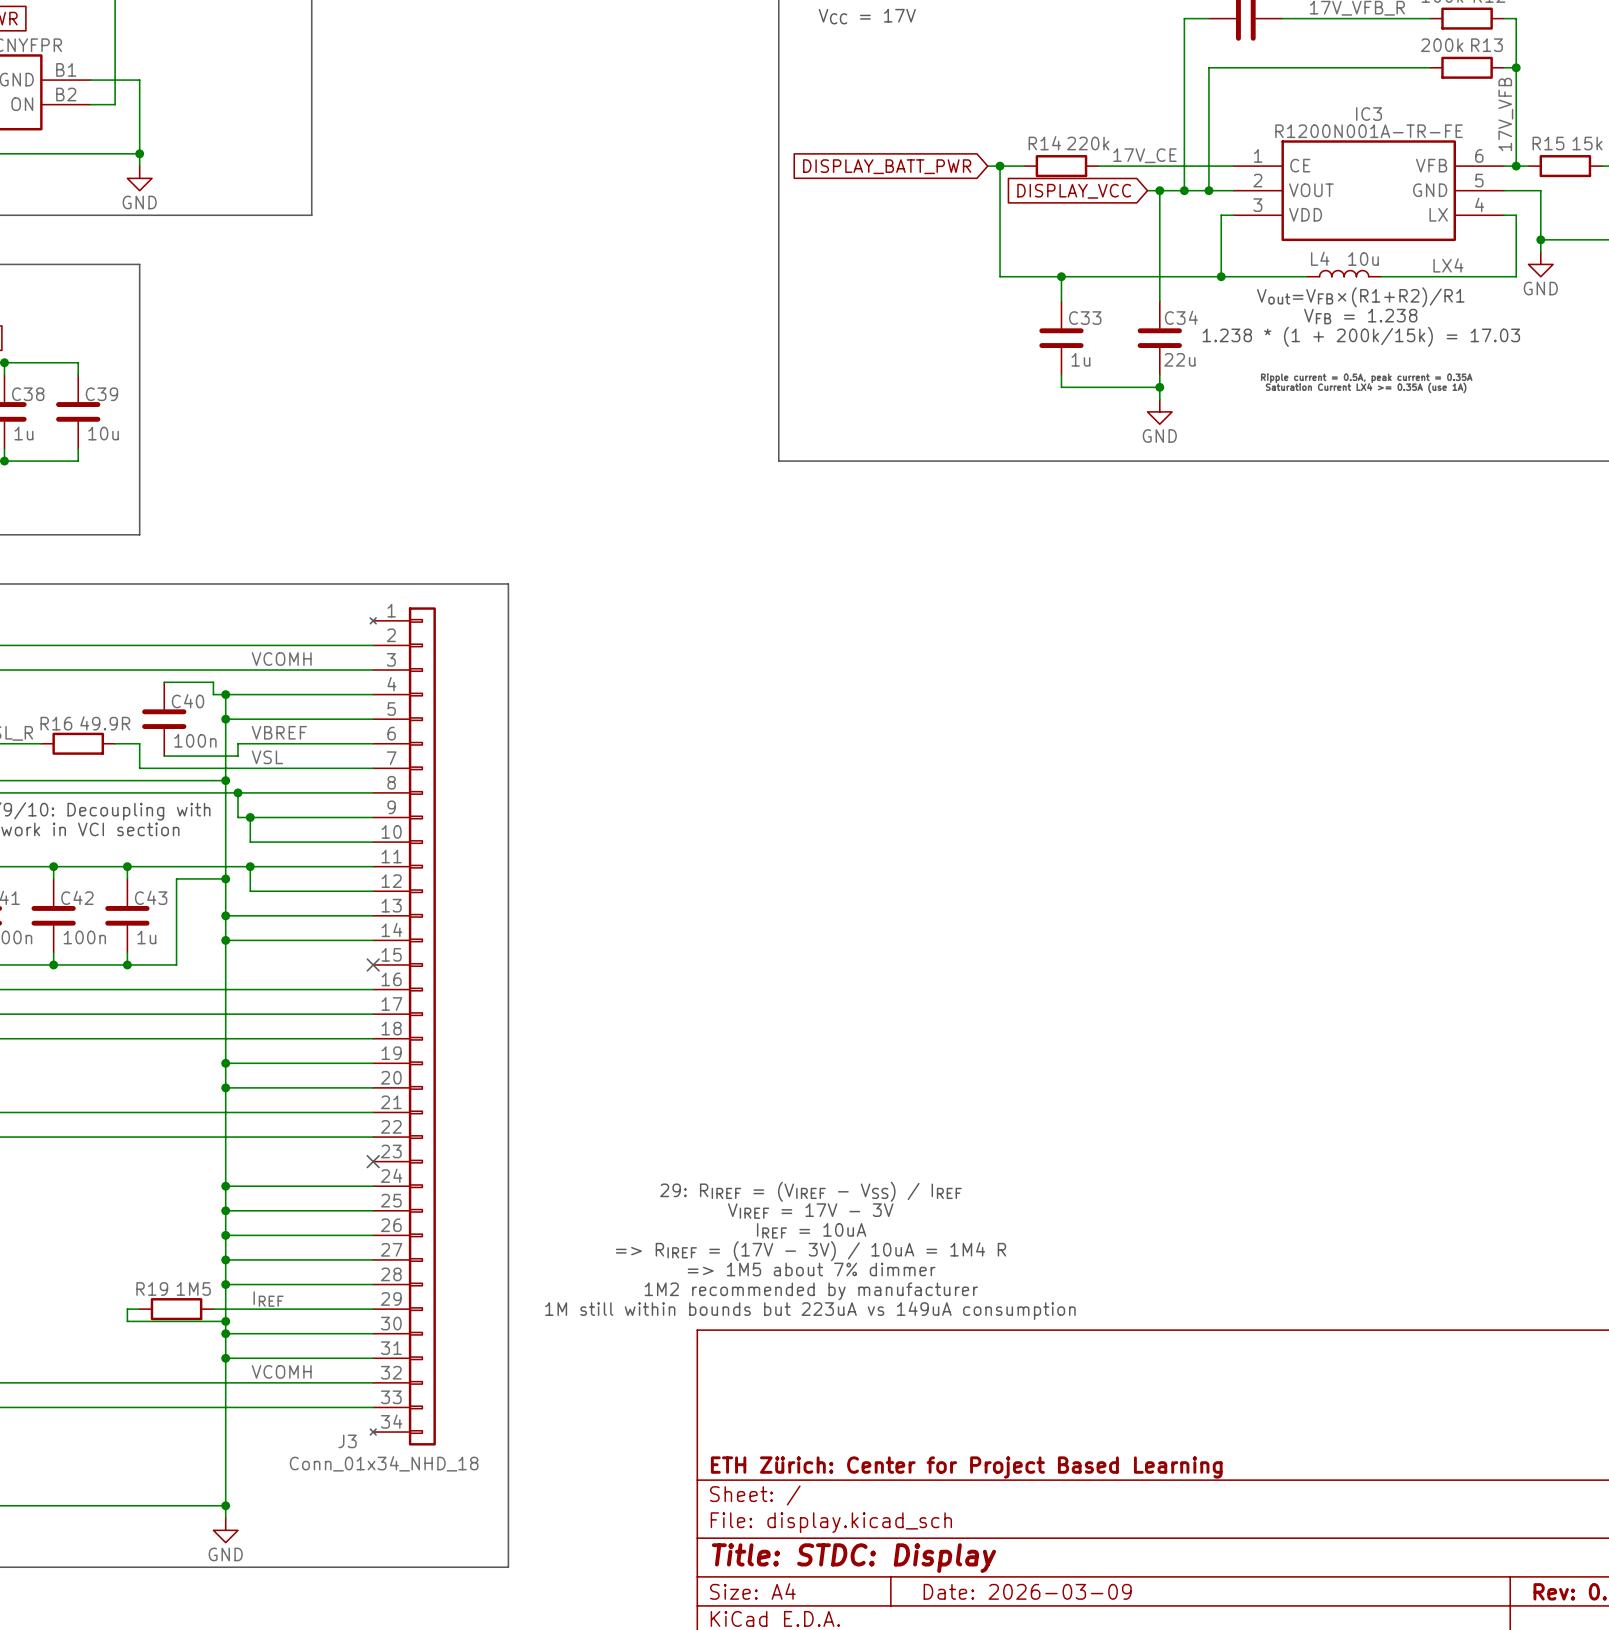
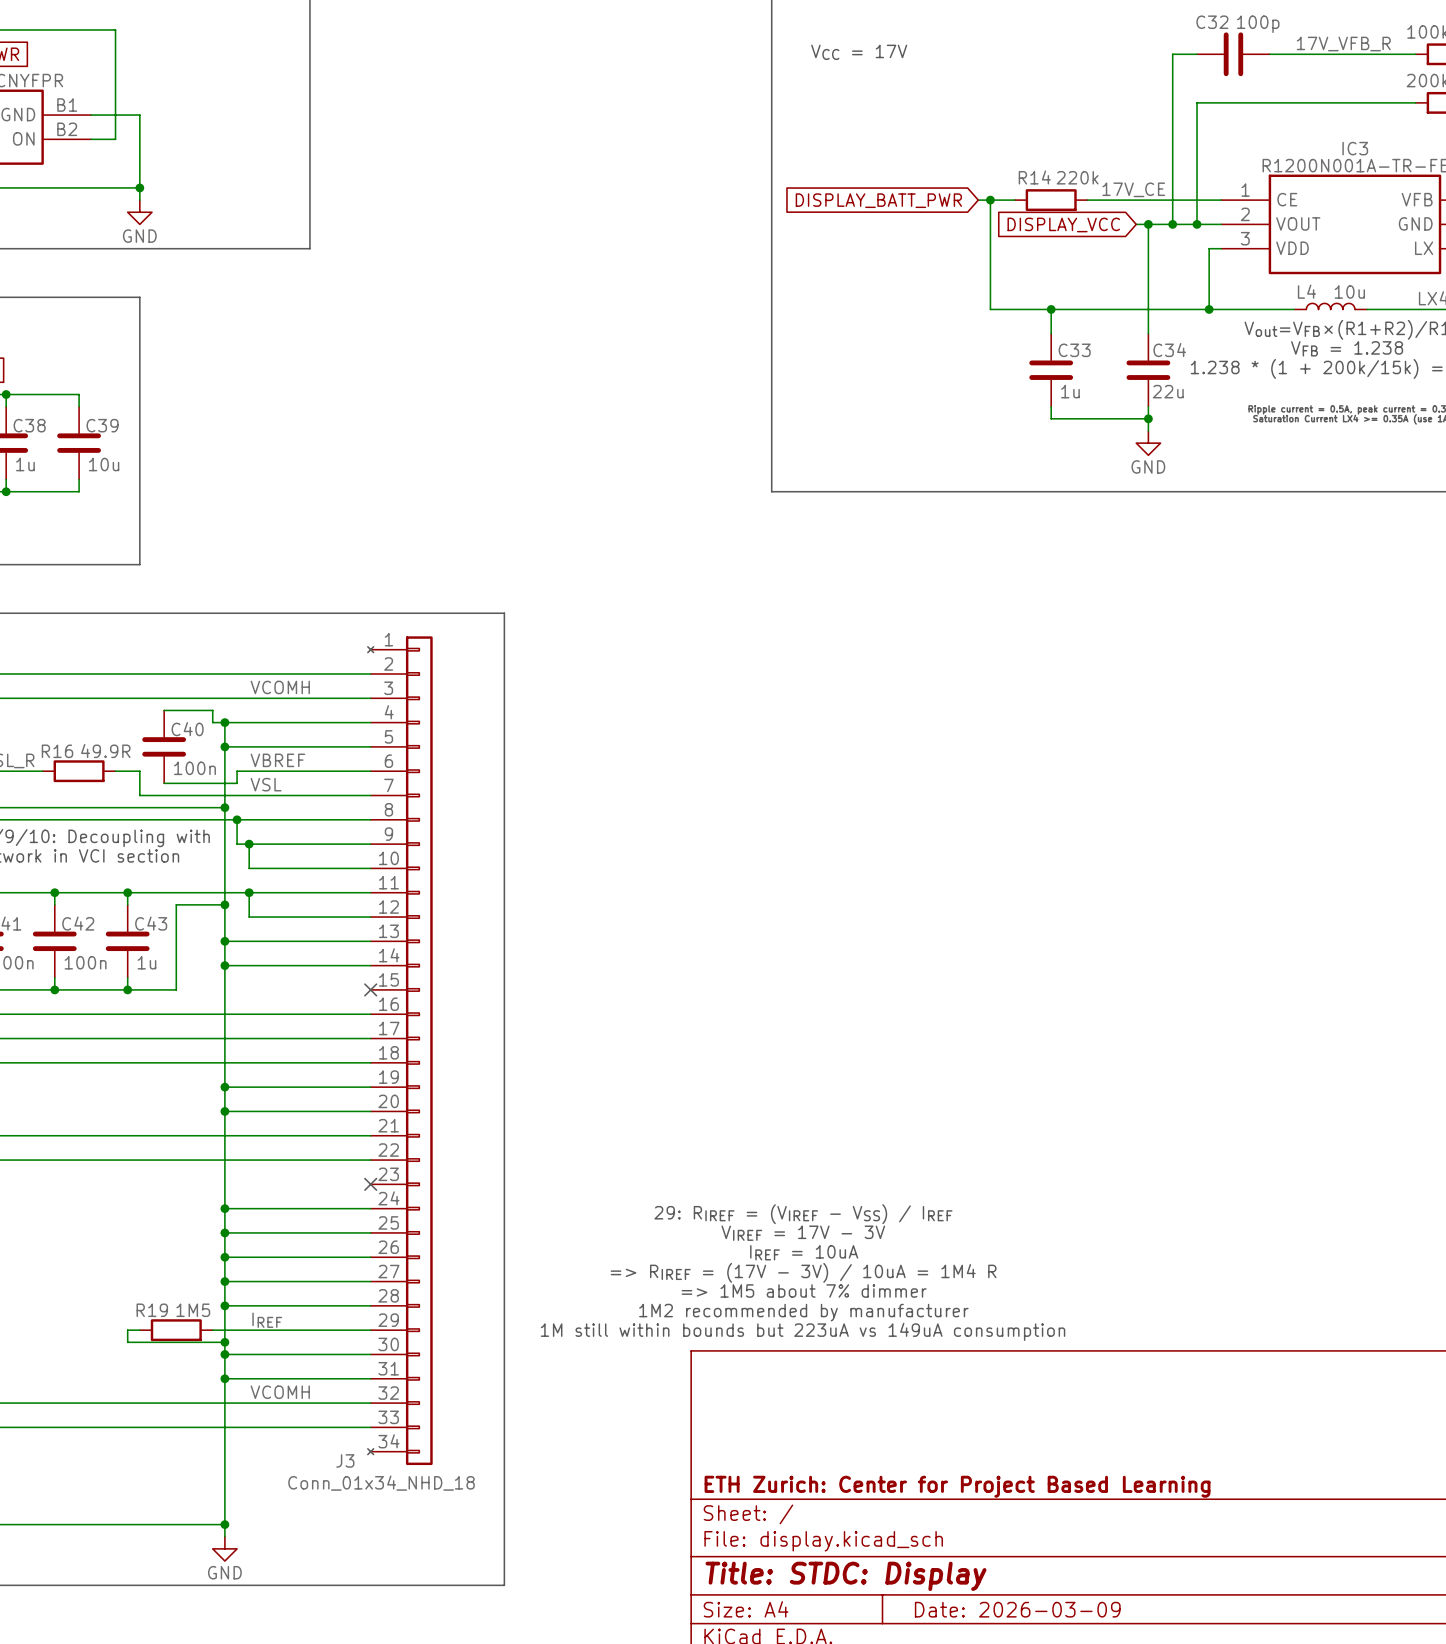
title block: ETH Zürich: Center for Project Based Learning (966, 1467) -> ETH Zurich: Center for Project Based Learning (957, 1486)

